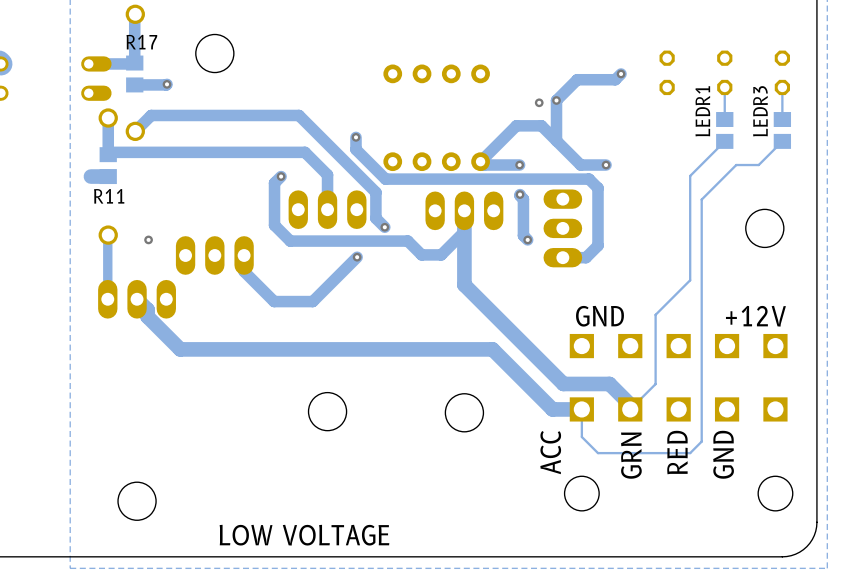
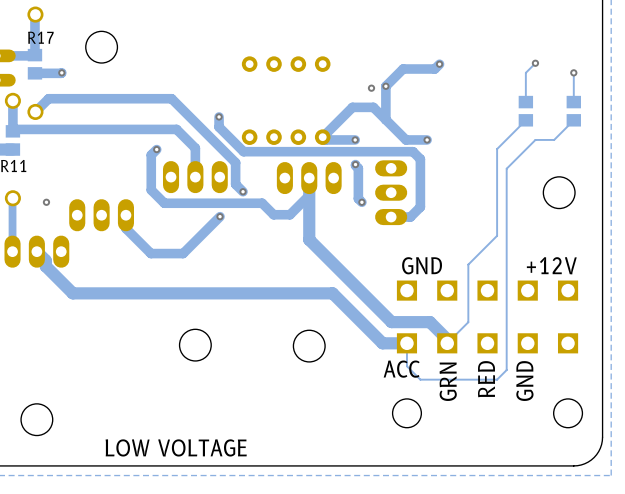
part: (667, 72) -> none
part: (724, 72) -> none
track: none -> (535, 63) (525, 72) (525, 75)
via: none -> (535, 63)
part: (782, 72) -> none
via: none -> (573, 72)
LEDR1 name: LEDR1 (702, 111) -> none
LEDR3 name: LEDR3 (760, 111) -> none
text rotation: 0° (550, 452) -> 90° clockwise (401, 369)

